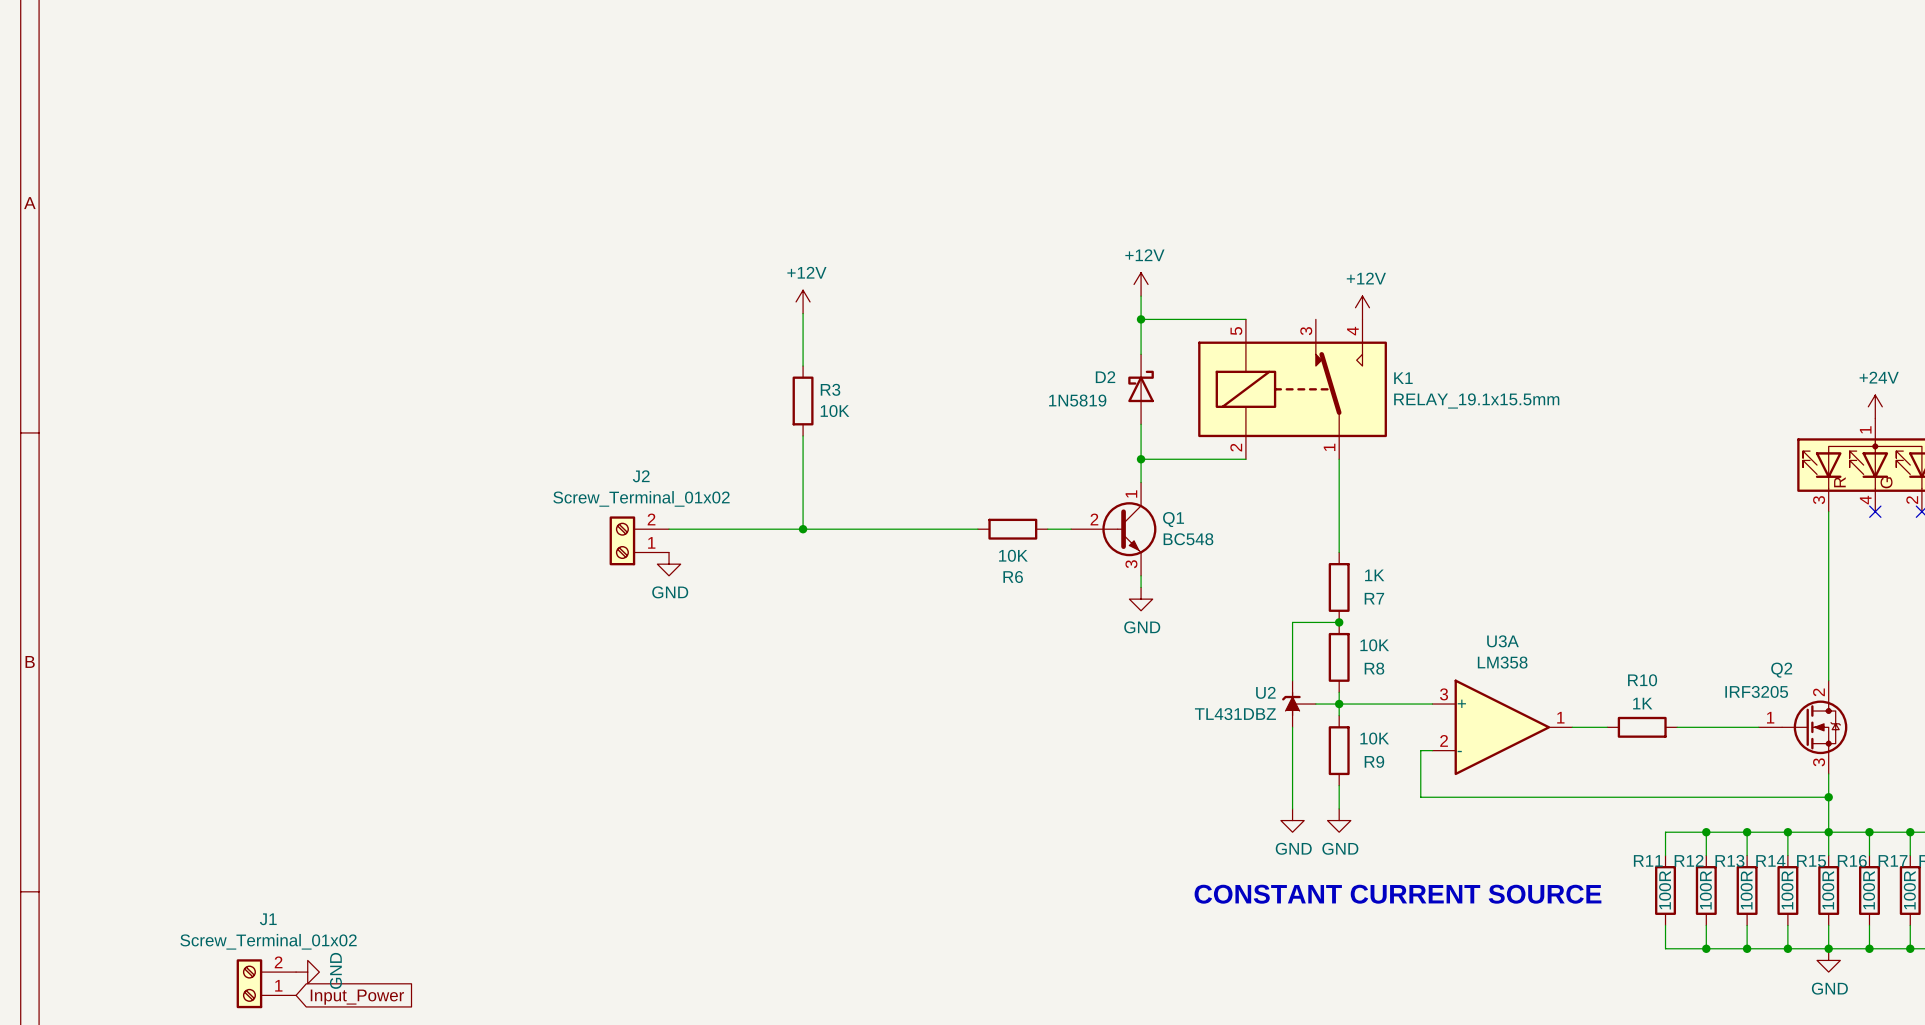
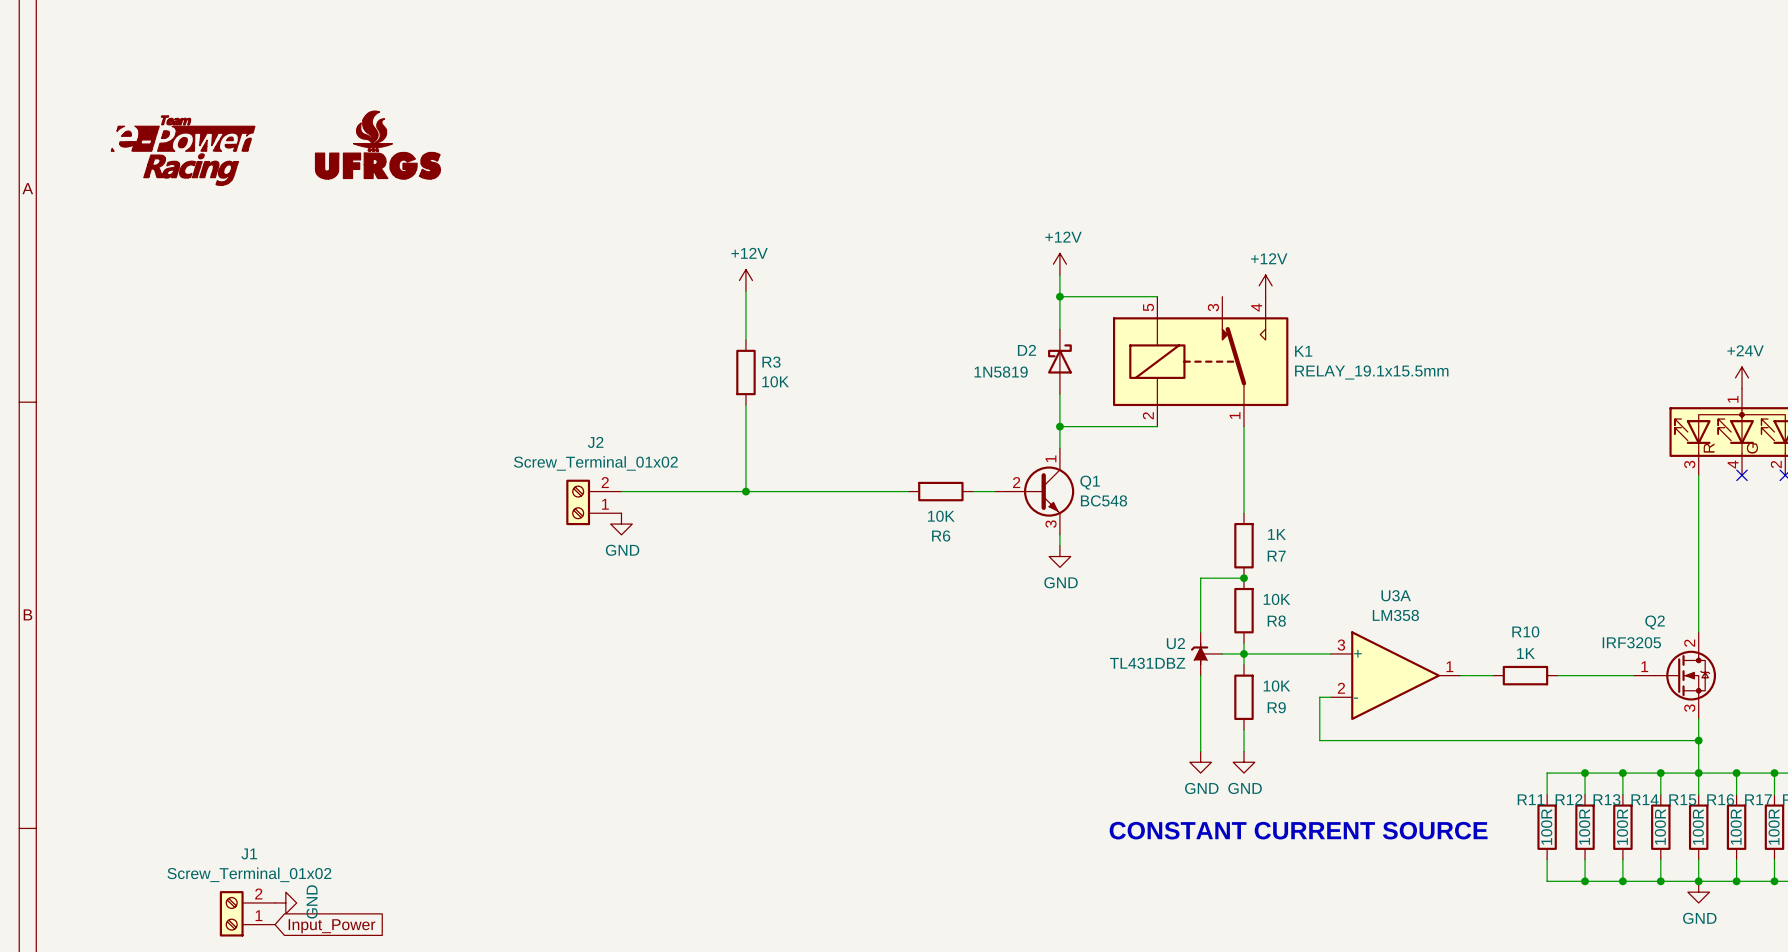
part: none -> (377, 145)
part: none -> (183, 150)

